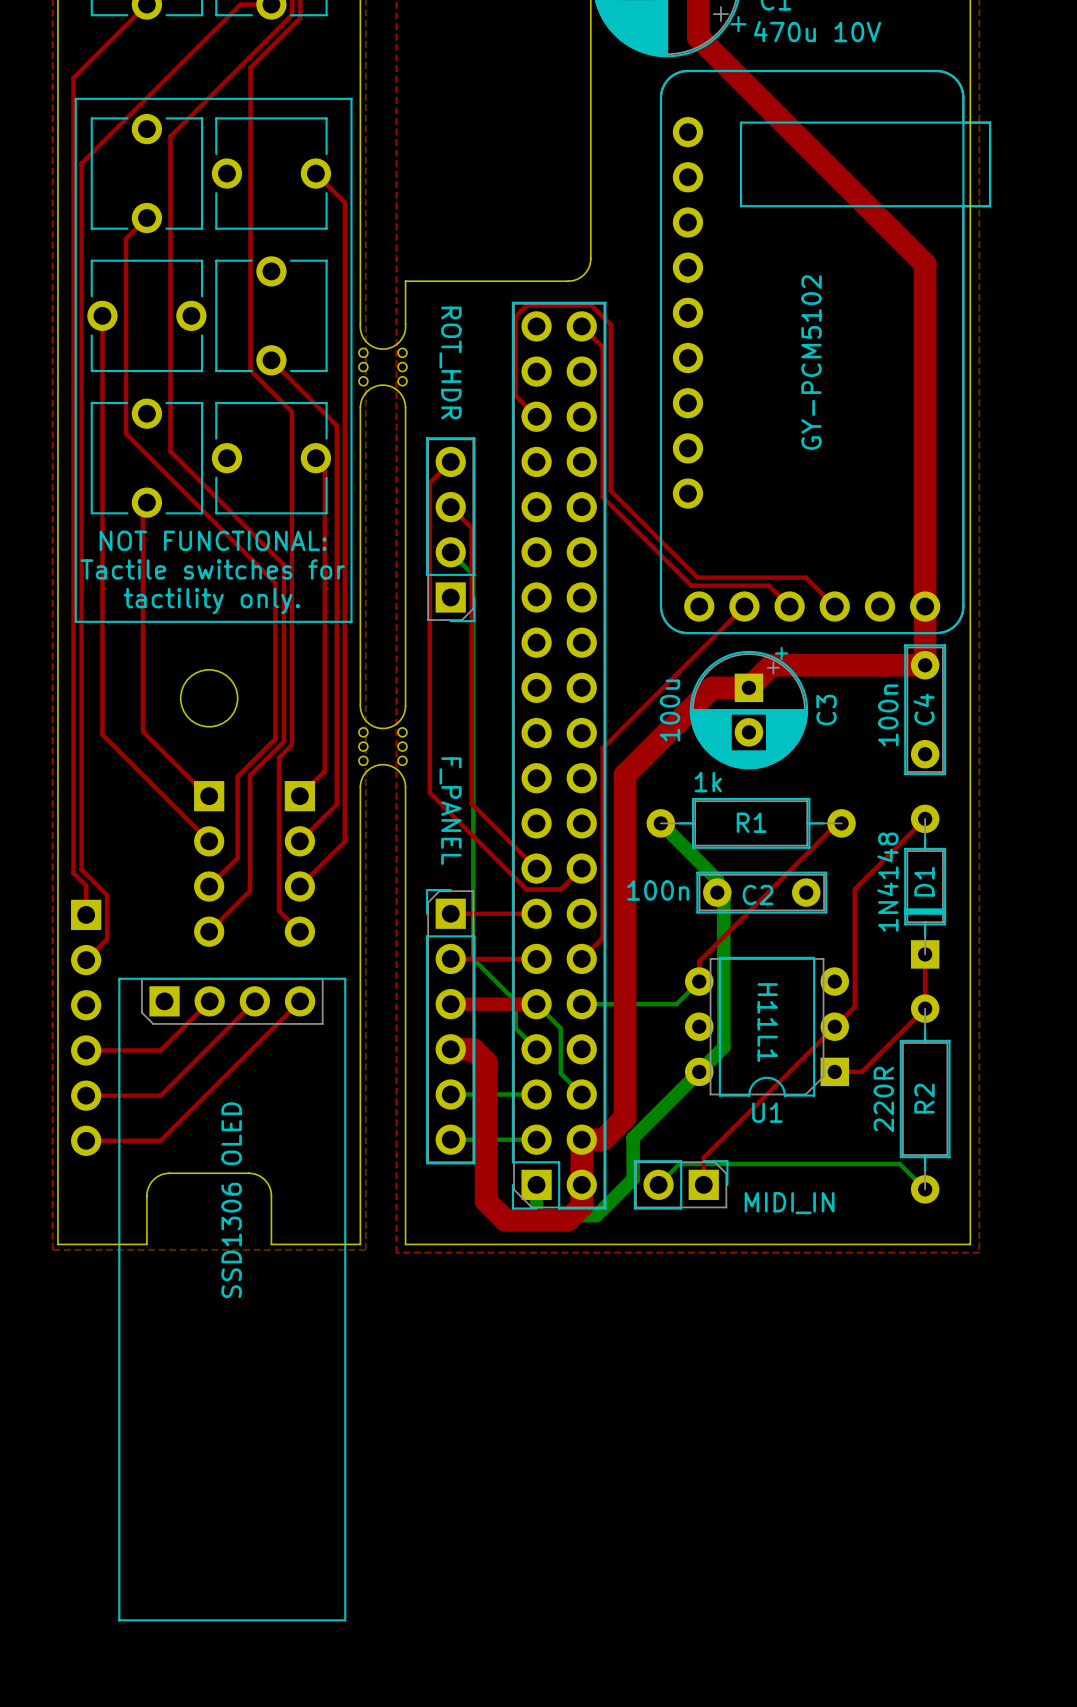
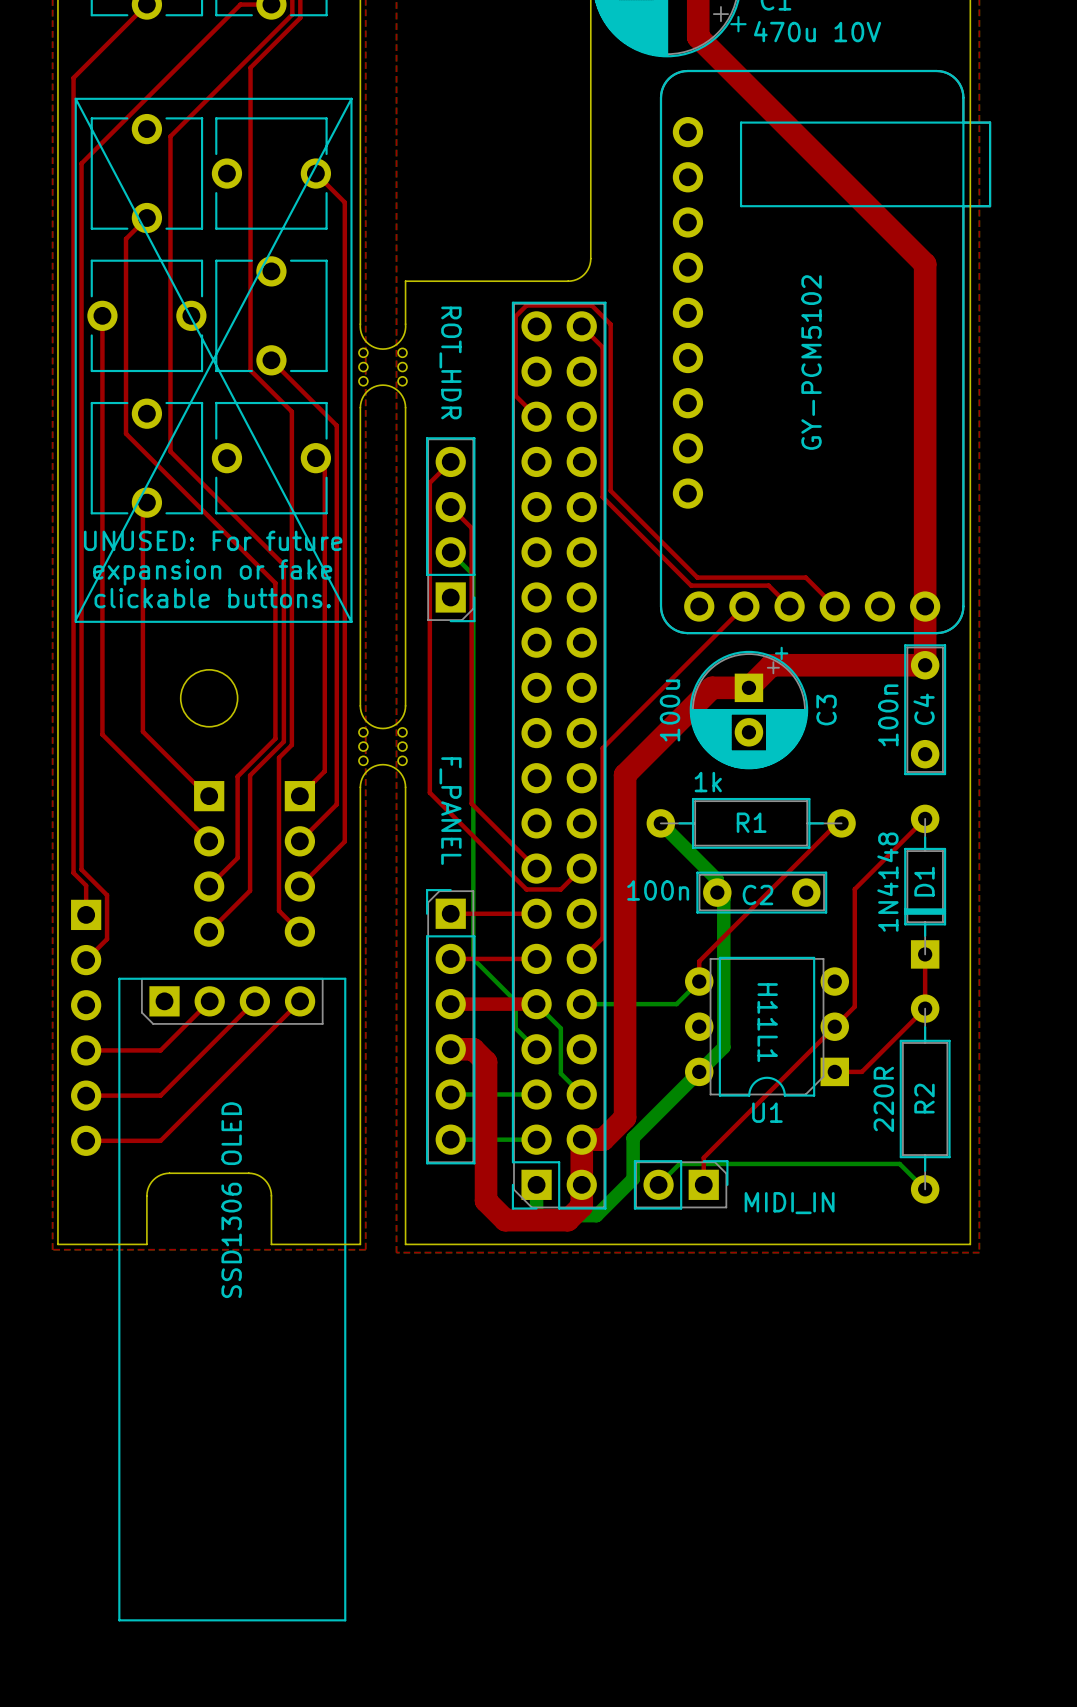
line: none -> (75, 98) (351, 621)
line: none -> (351, 98) (75, 620)
text: NOT FUNCTIONAL: (213, 540) -> UNUSED: For future (213, 540)
text: Tactile switches for (212, 569) -> expansion or fake (212, 572)
text: tactility only. (211, 601) -> clickable buttons. (212, 598)

